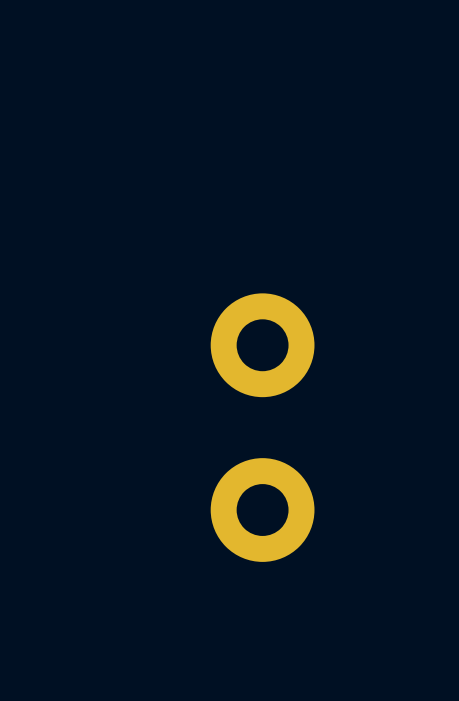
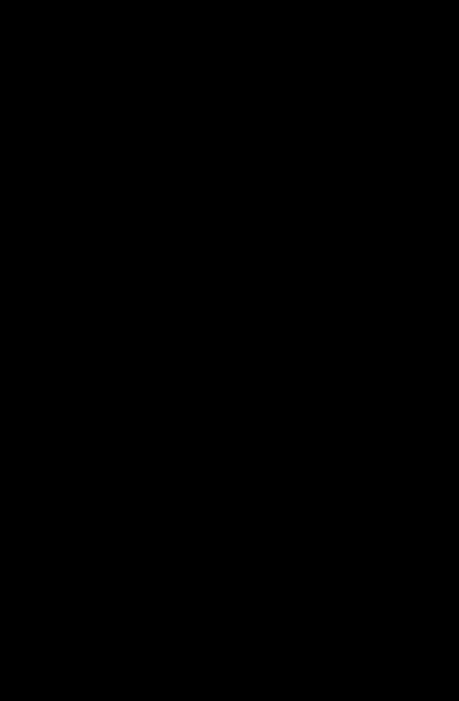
part: (262, 427) -> none

